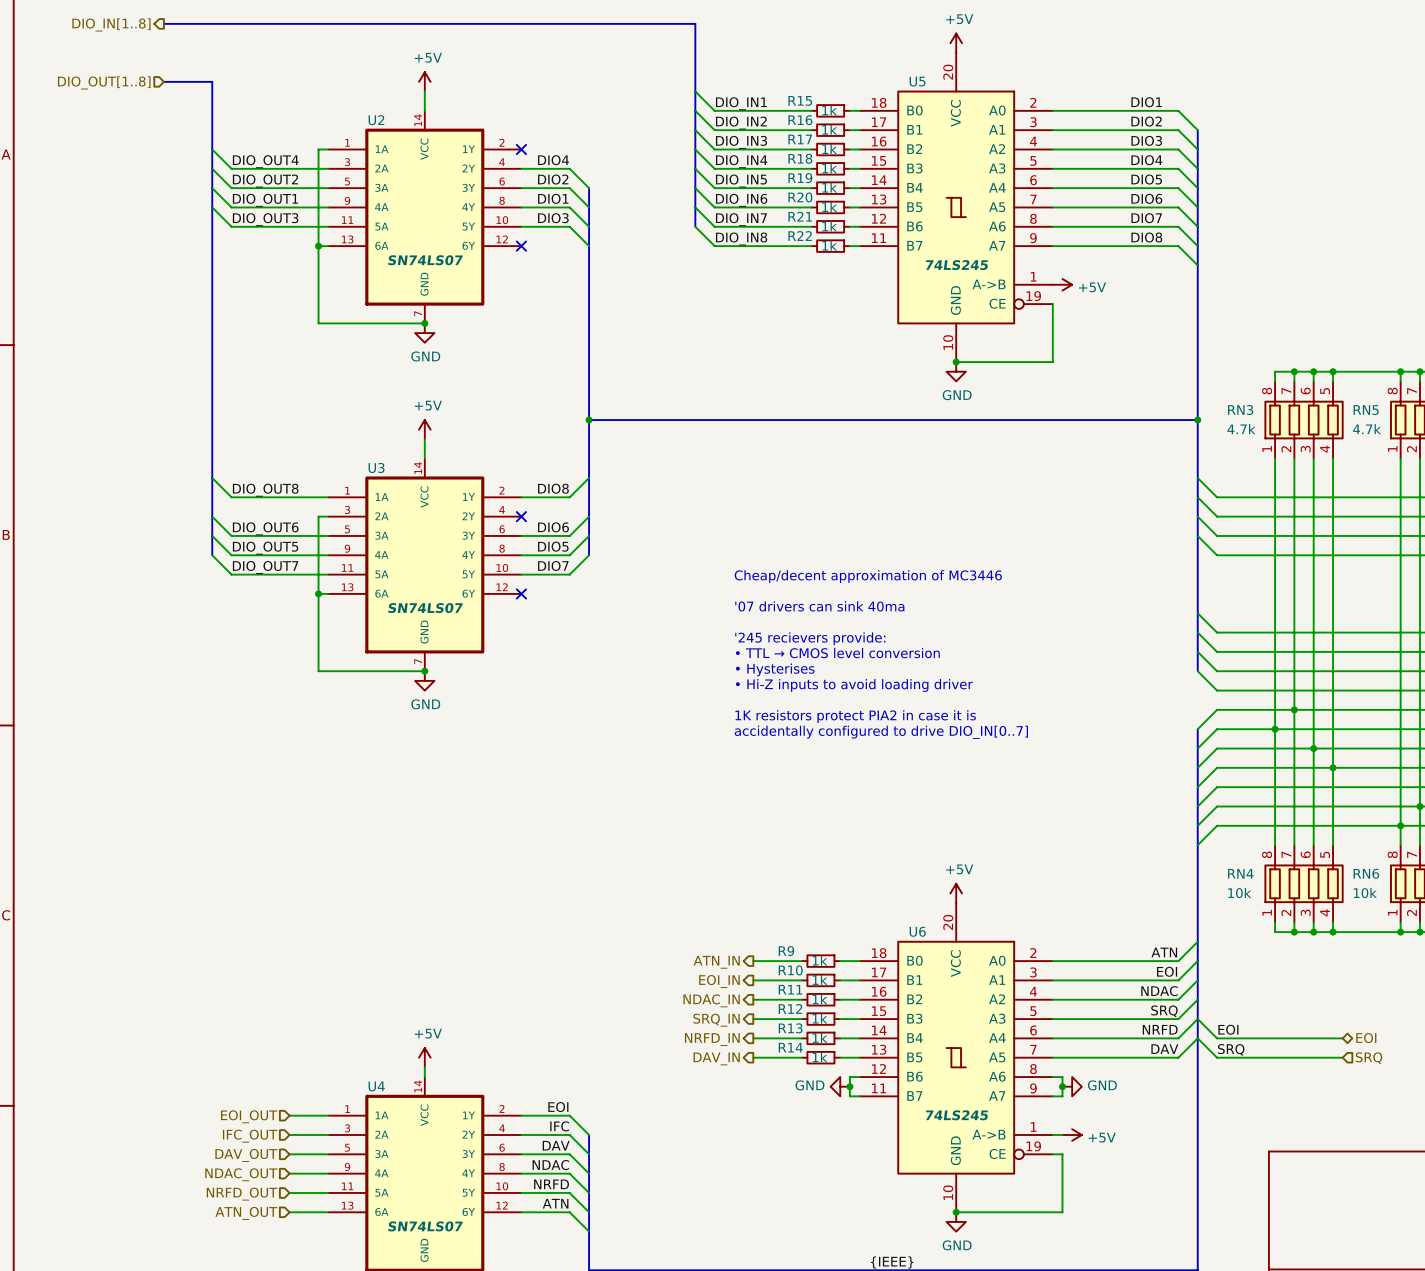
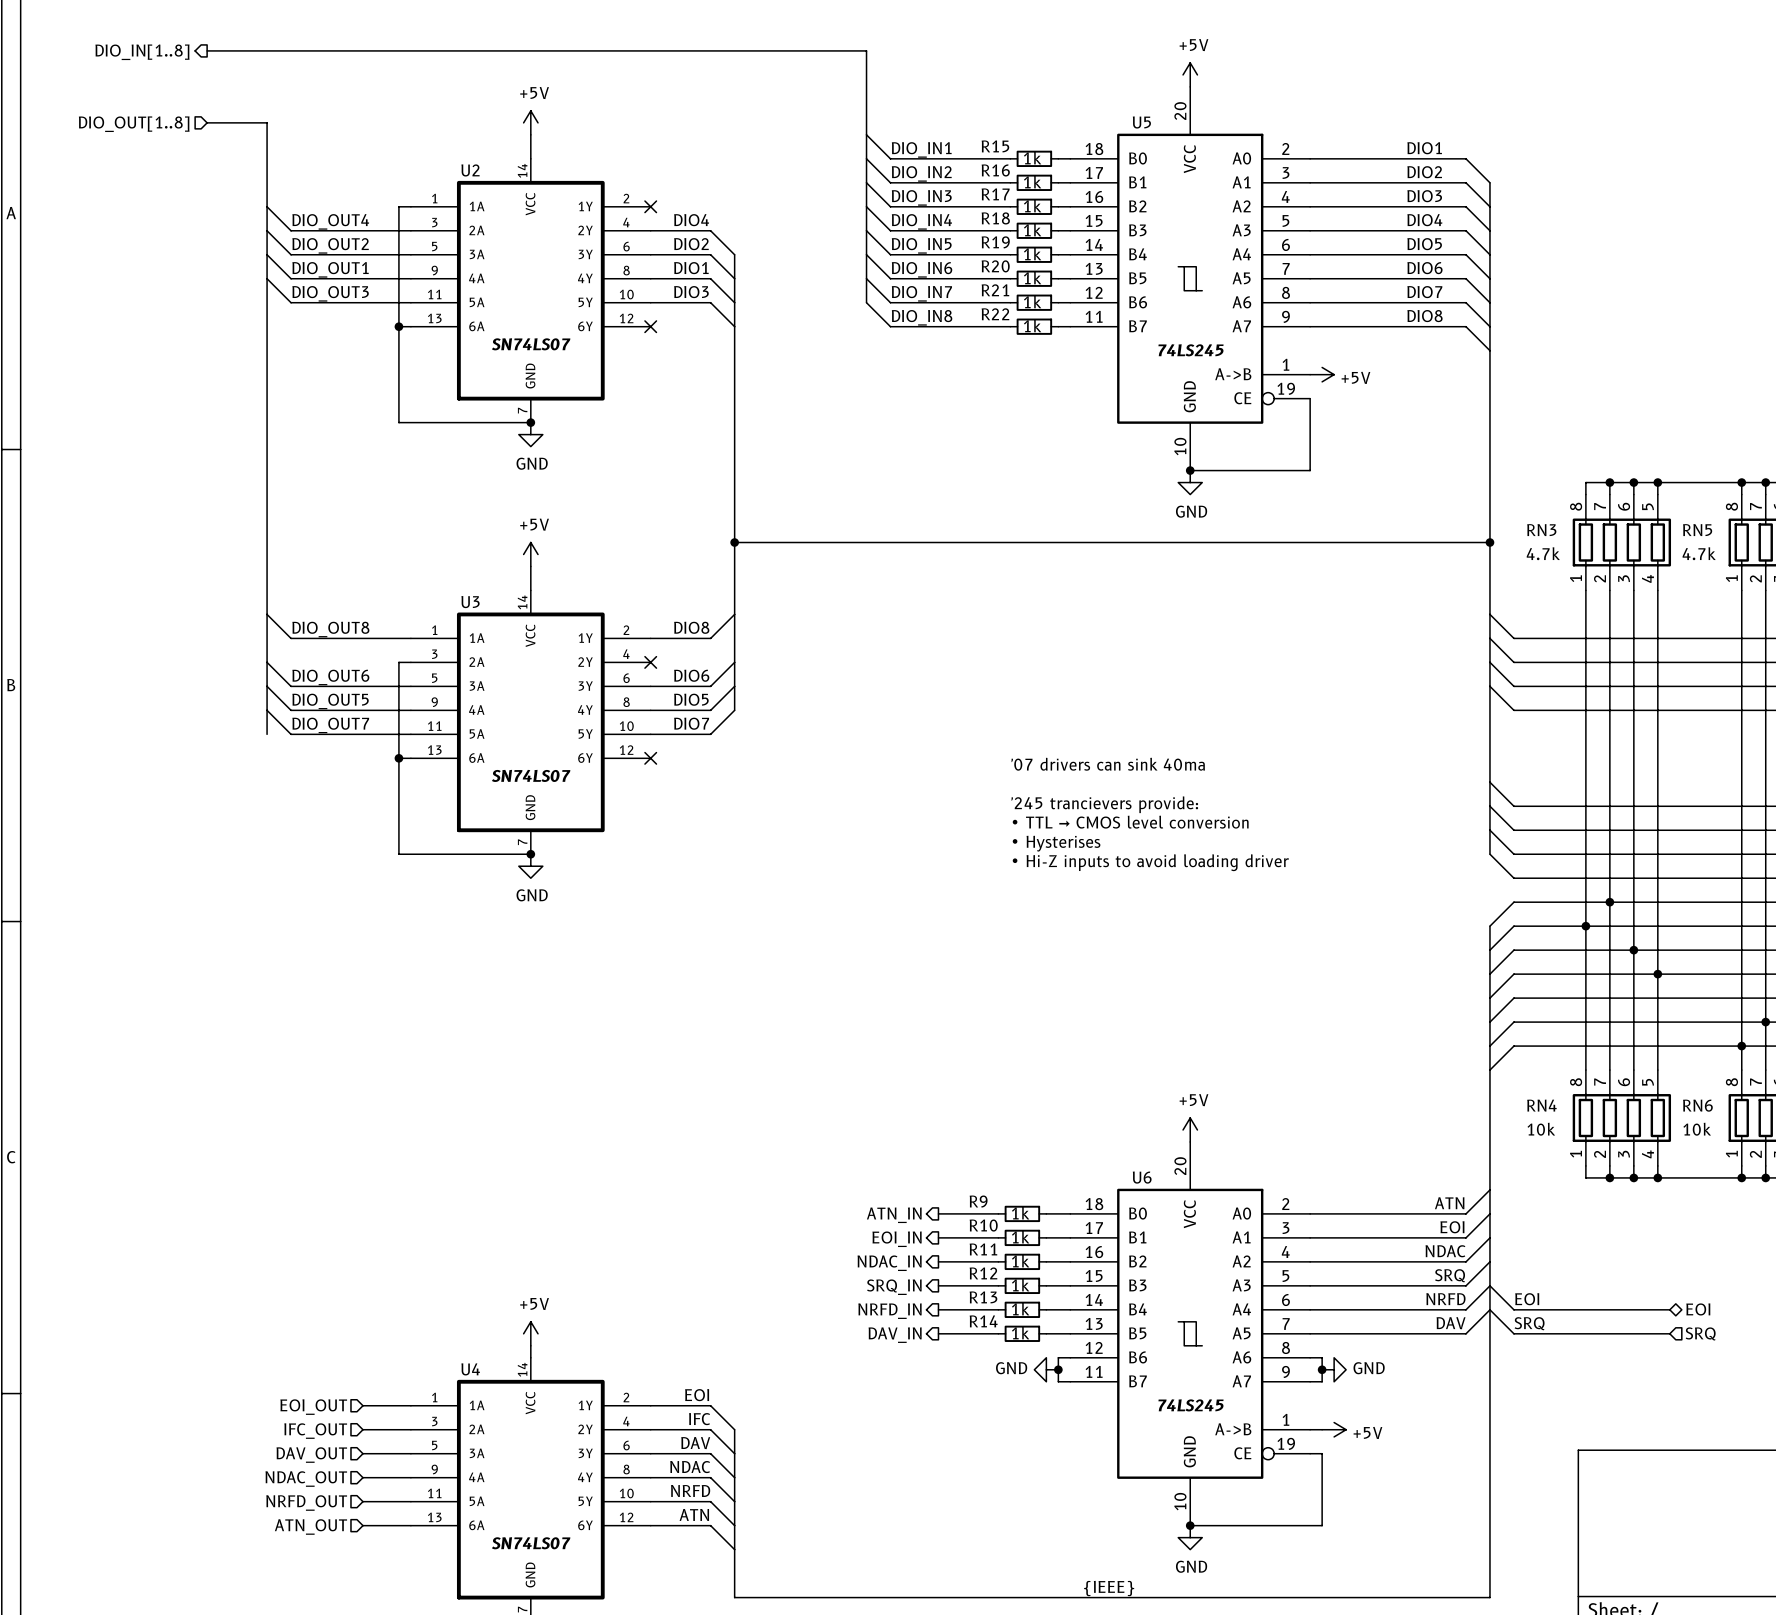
bus: none -> (267, 710) (267, 734)
text: Cheap/decent approximation of MC3446 (868, 576) -> none
text position: '07 drivers can sink 40ma (819, 606) -> '07 drivers can sink 40ma (1108, 764)
text: '245 recievers provide: (810, 638) -> '245 trancievers provide: (1104, 804)
text position: • TTL → CMOS level conversion (837, 653) -> • TTL → CMOS level conversion (1130, 822)
text position: • Hysterises (775, 669) -> • Hysterises (1056, 843)
text position: • Hi-Z inputs to avoid loading driver (854, 685) -> • Hi-Z inputs to avoid loading driver (1150, 862)
text: 1K resistors protect PIA2 in case it is (855, 716) -> none
text: accidentally configured to drive DIO_IN[0..7] (881, 732) -> none

